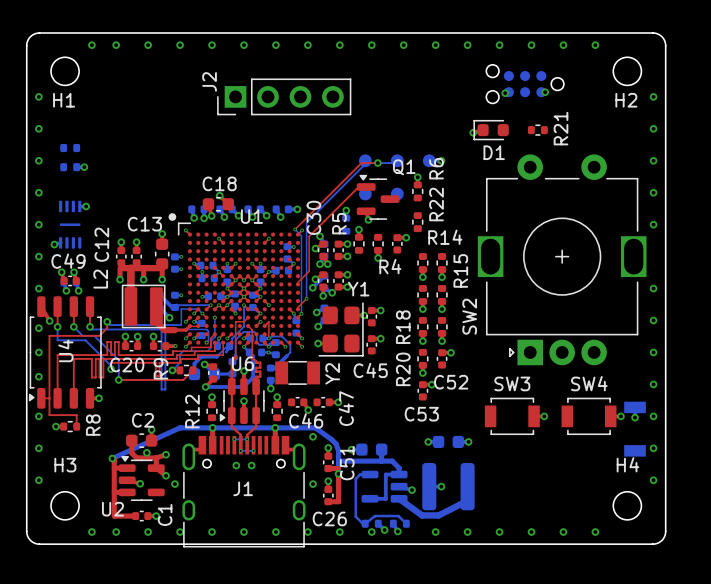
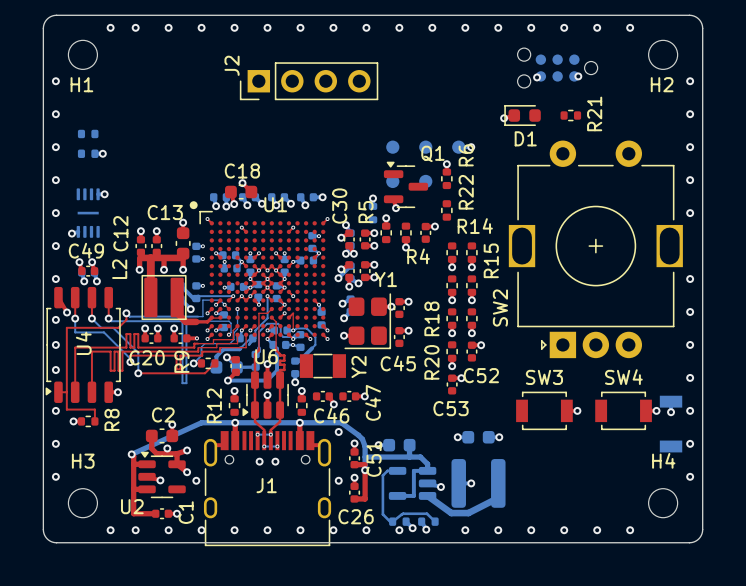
bottom track: (365, 160) (362, 166) (306, 222) (306, 298) -> none
bottom track: (397, 160) (391, 163) (377, 163) -> none
top track: (377, 163) (361, 163) (295, 229) -> none
via: (377, 163) -> none
top track: (366, 186) (356, 188) (309, 236) (309, 271) (297, 284) -> none
bottom track: (295, 229) (301, 235) (301, 313) -> none
via: (295, 229) -> none
top track: (306, 298) (297, 309) -> none
via: (306, 298) -> none
top track: (301, 313) (297, 317) -> none
via: (301, 313) -> none

